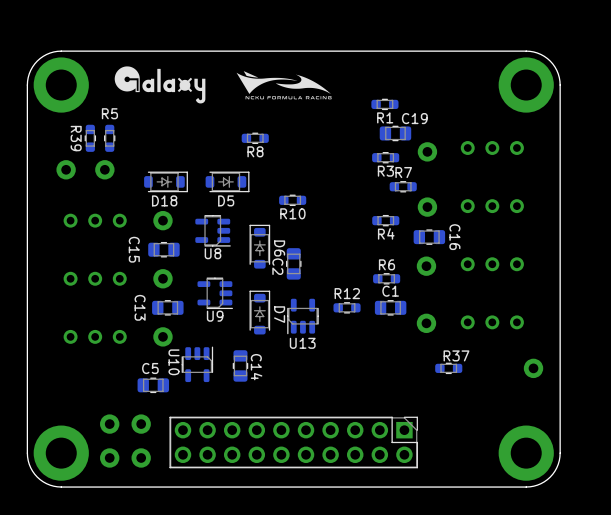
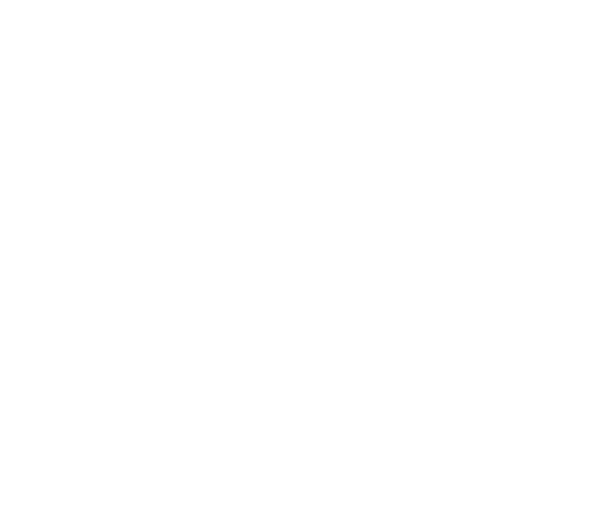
board edge: (526, 51) (61, 51) (50, 53) (40, 58) (30, 70) (27, 85) (27, 453) (29, 464) (34, 474) (46, 483) (61, 487) (526, 487) (537, 485) (547, 479) (556, 467) (560, 453) (560, 85) (558, 73) (550, 61) (540, 54) (526, 51) -> none
drawing: [114, 66, 206, 104] -> none
drawing: [236, 71, 332, 100] -> none
part: (61, 85) -> none
part: (526, 85) -> none
R1: (384, 104) -> none
C19: (395, 133) -> none
R39: (90, 138) -> none
R5: (109, 138) -> none
R8: (255, 138) -> none
part: (492, 148) -> none
part: (427, 151) -> none
R3: (385, 157) -> none
part: (66, 169) -> none
part: (104, 169) -> none
D18: (165, 181) -> none
D5: (227, 181) -> none
R7: (403, 186) -> none
R10: (292, 200) -> none
part: (492, 206) -> none
part: (427, 207) -> none
part: (95, 220) -> none
part: (162, 220) -> none
R4: (385, 220) -> none
U8: (213, 230) -> none
C16: (429, 237) -> none
D6: (259, 246) -> none
C15: (163, 249) -> none
C2: (293, 263) -> none
part: (492, 264) -> none
part: (426, 266) -> none
part: (95, 278) -> none
part: (162, 278) -> none
R6: (386, 278) -> none
U9: (215, 293) -> none
C13: (167, 307) -> none
R12: (347, 307) -> none
C1: (390, 307) -> none
D7: (259, 312) -> none
U13: (302, 316) -> none
part: (492, 322) -> none
part: (426, 323) -> none
part: (95, 336) -> none
part: (162, 336) -> none
U10: (197, 364) -> none
C14: (240, 365) -> none
R37: (448, 368) -> none
part: (533, 368) -> none
C5: (153, 385) -> none
part: (109, 424) -> none
part: (141, 424) -> none
part: (293, 442) -> none
part: (61, 453) -> none
part: (526, 453) -> none
part: (109, 457) -> none
part: (141, 457) -> none

